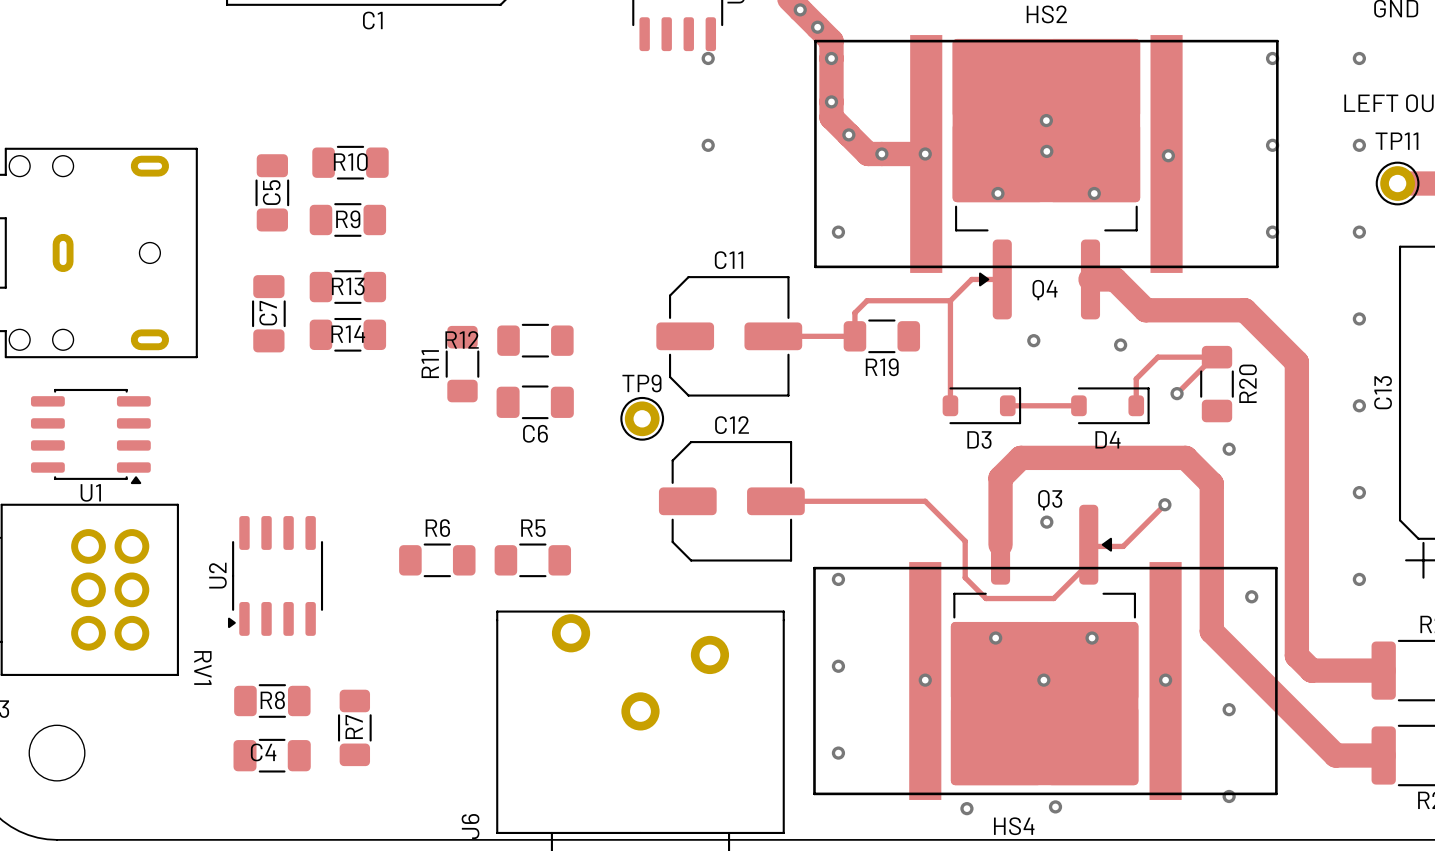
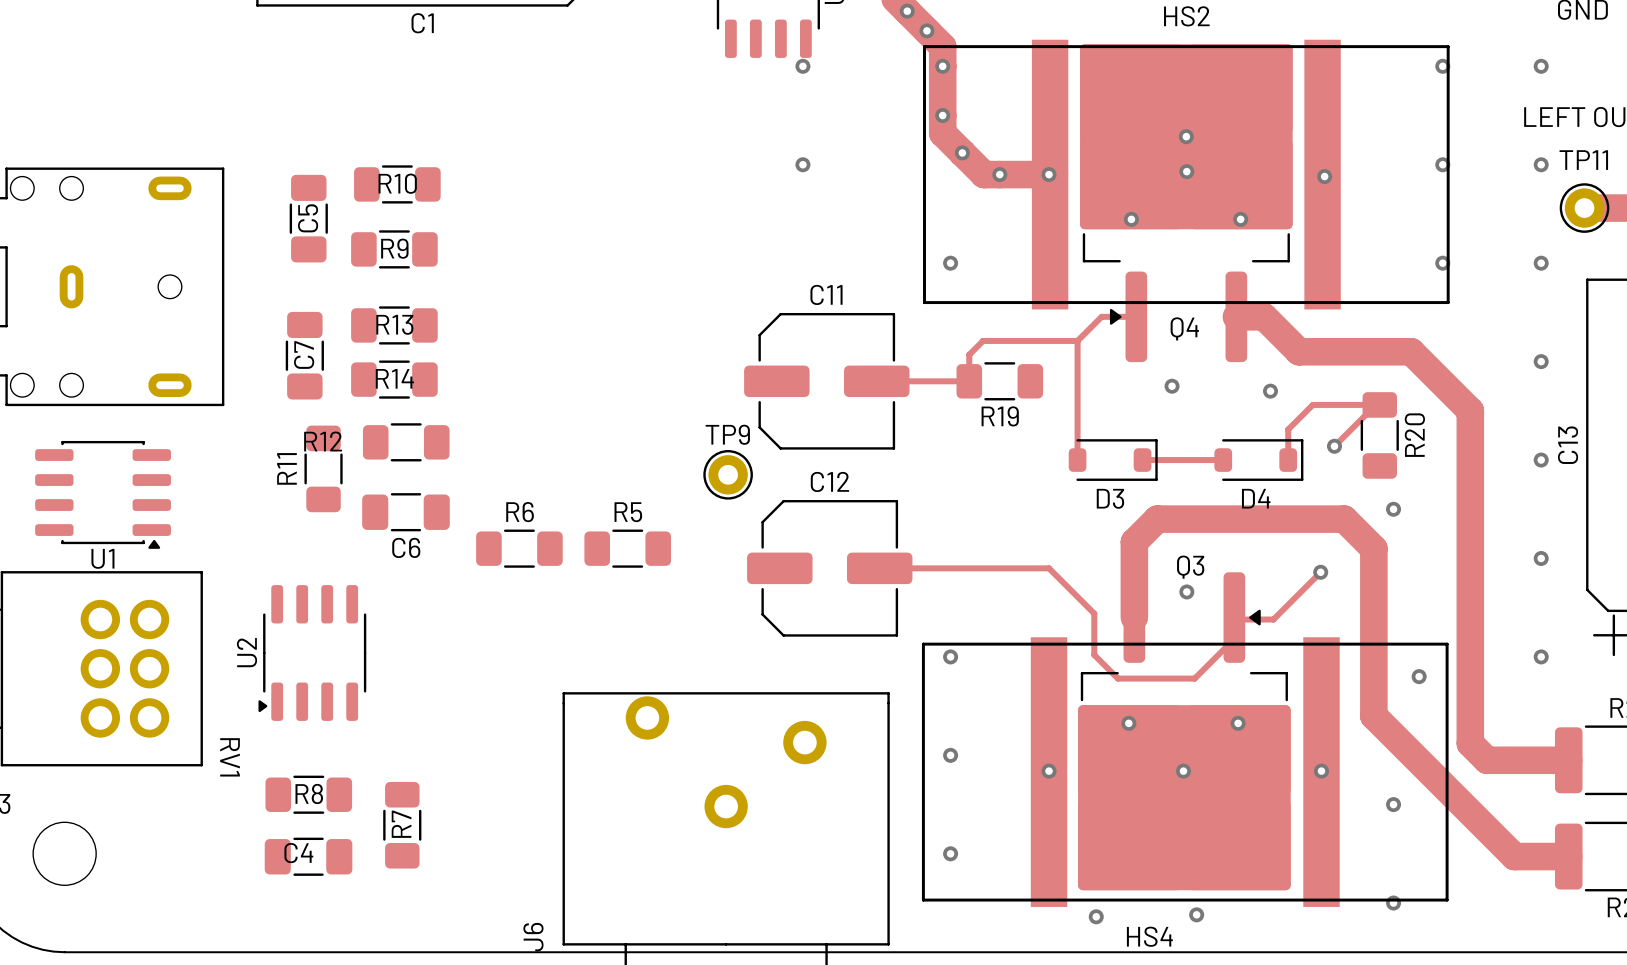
R12 position: (535, 340) -> (406, 442)
R11 position: (462, 364) -> (323, 468)
C6 position: (535, 402) -> (405, 512)
R6 position: (437, 560) -> (519, 548)
R5 position: (532, 560) -> (627, 548)

